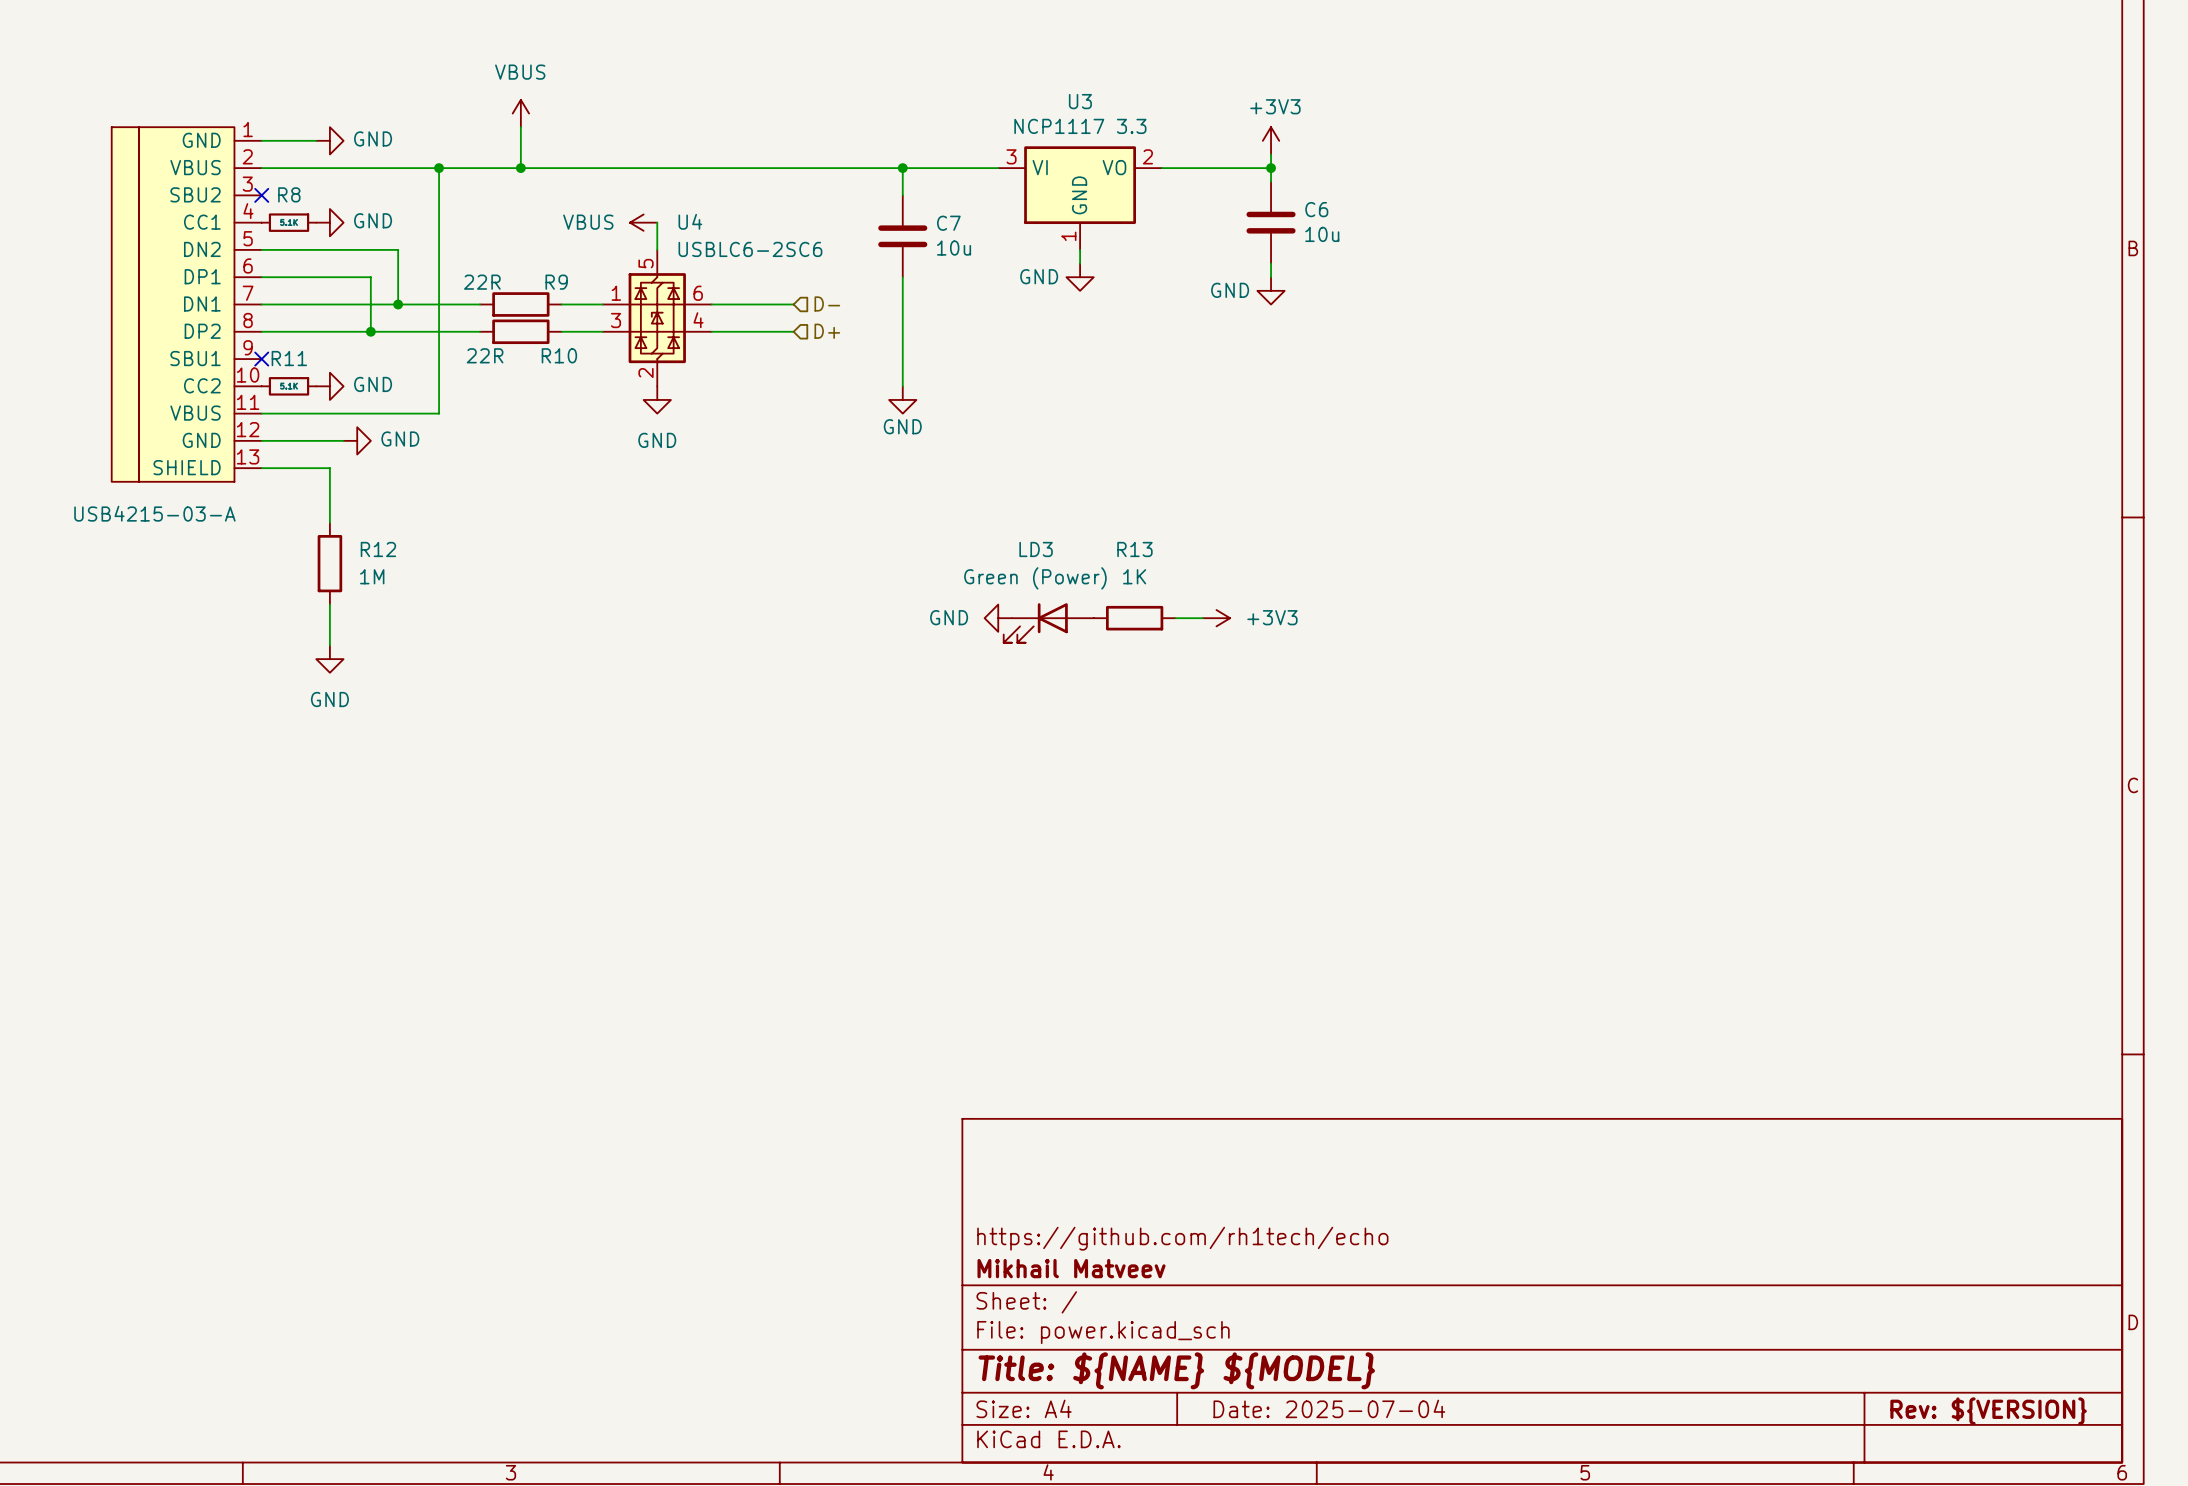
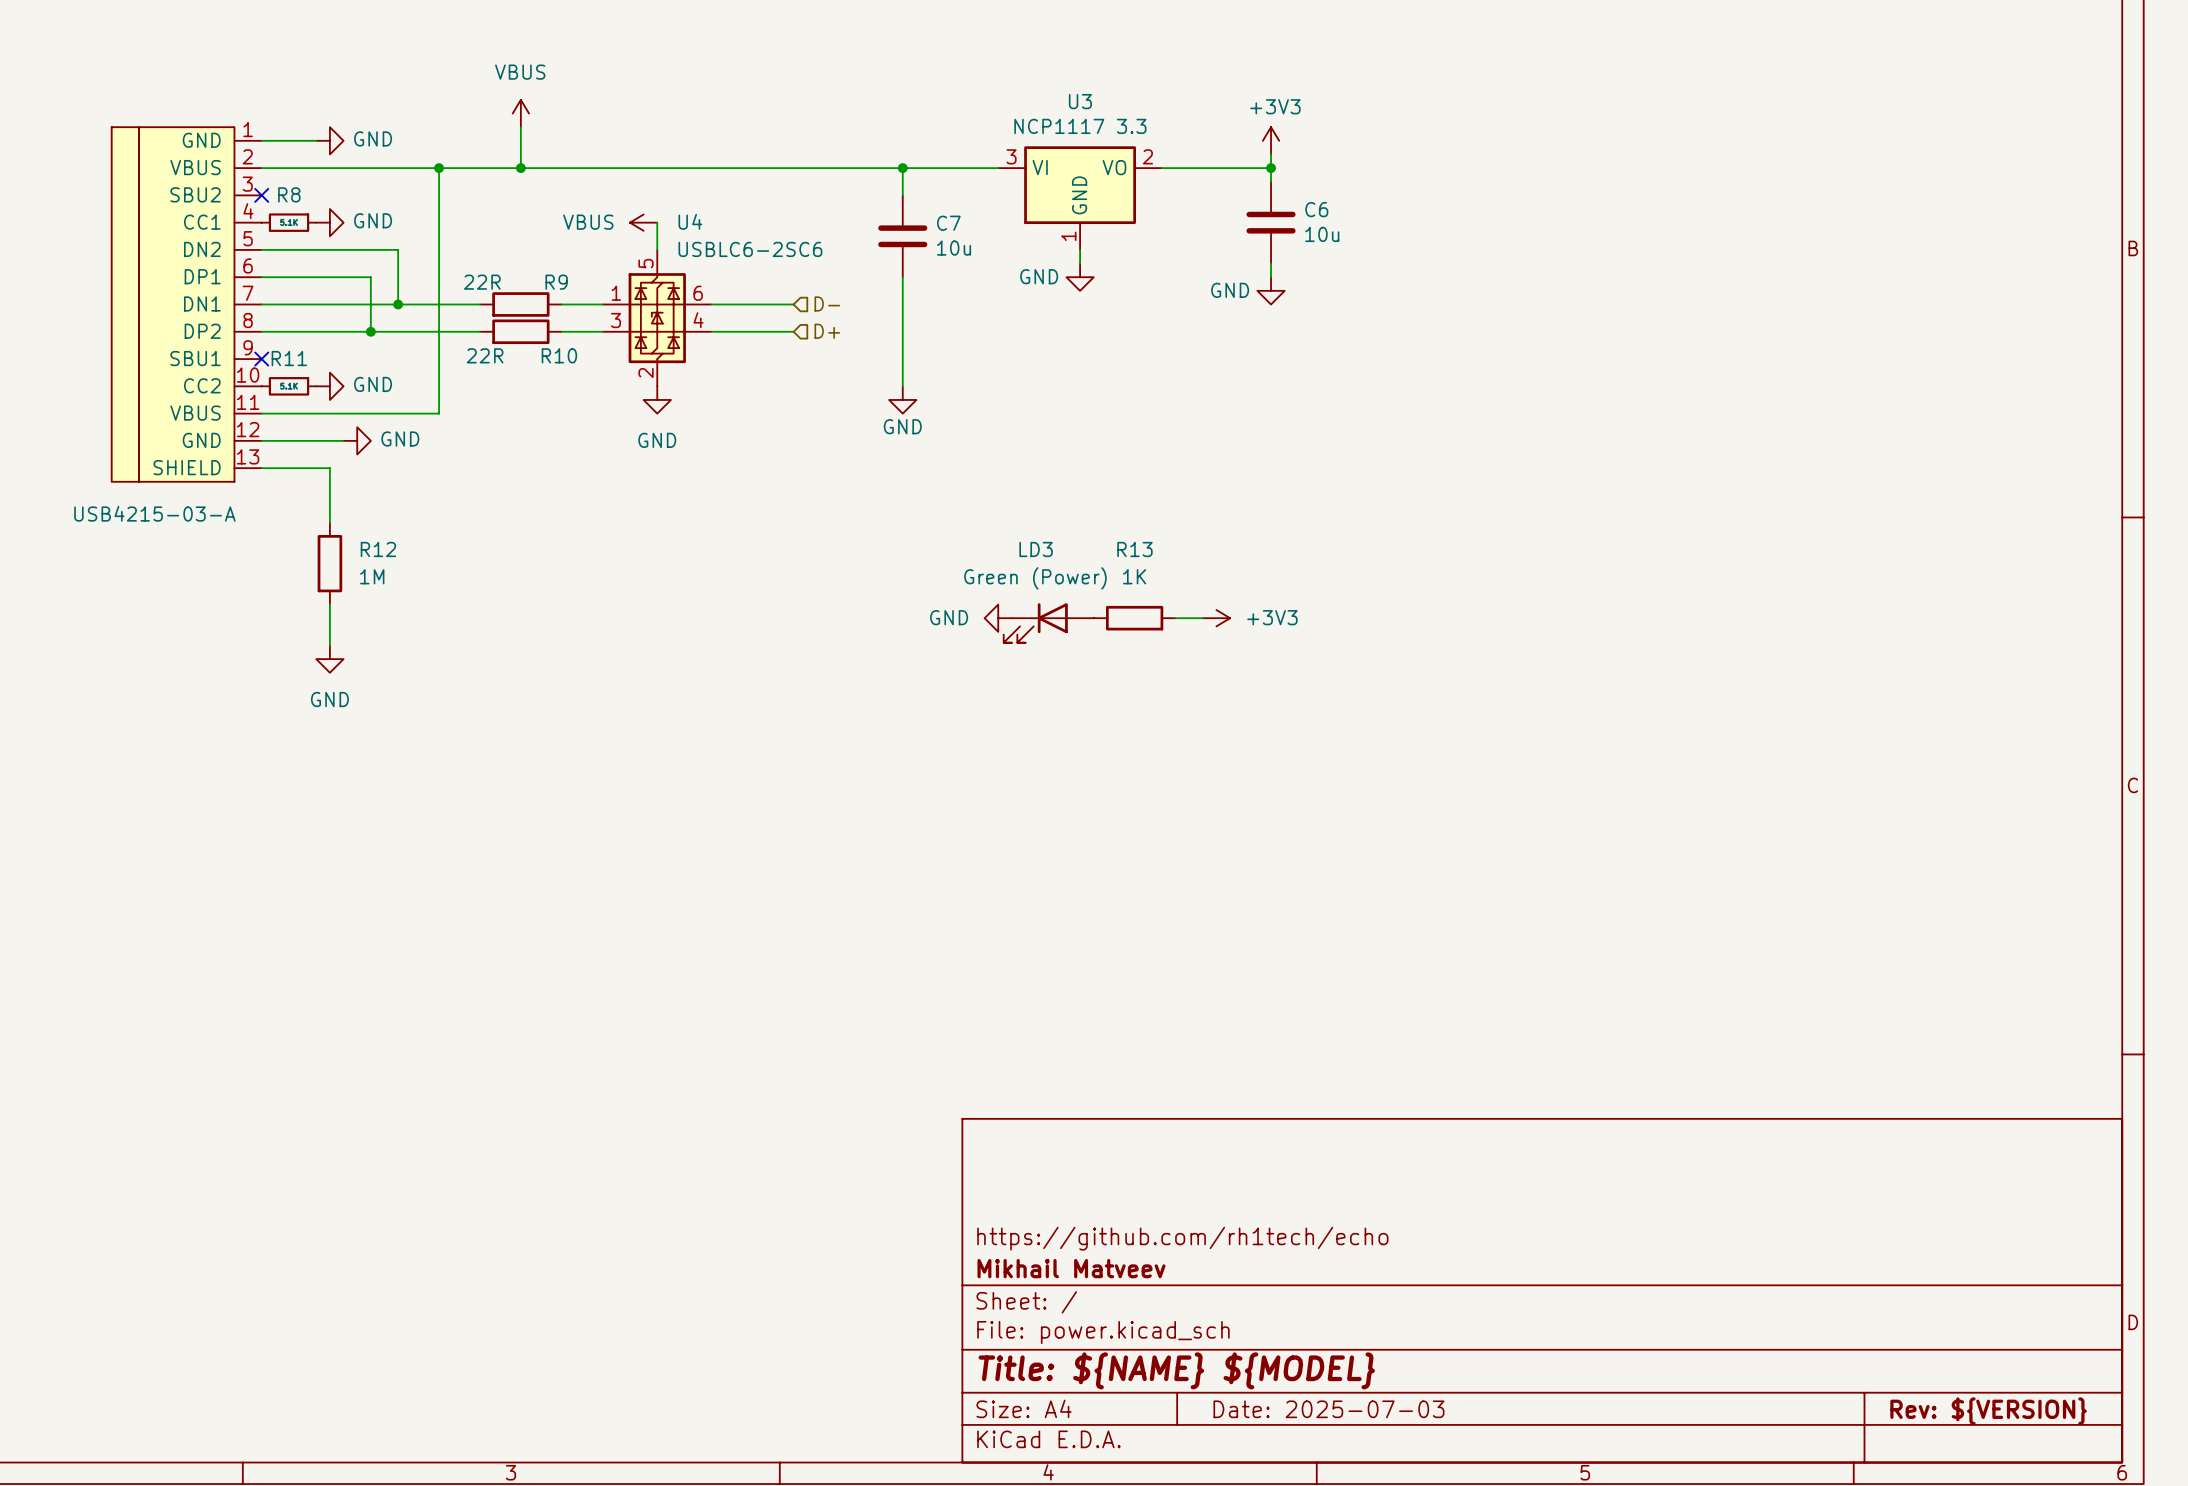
title block: Date: 2025-07-04 (1329, 1408) -> Date: 2025-07-03 (1328, 1409)

